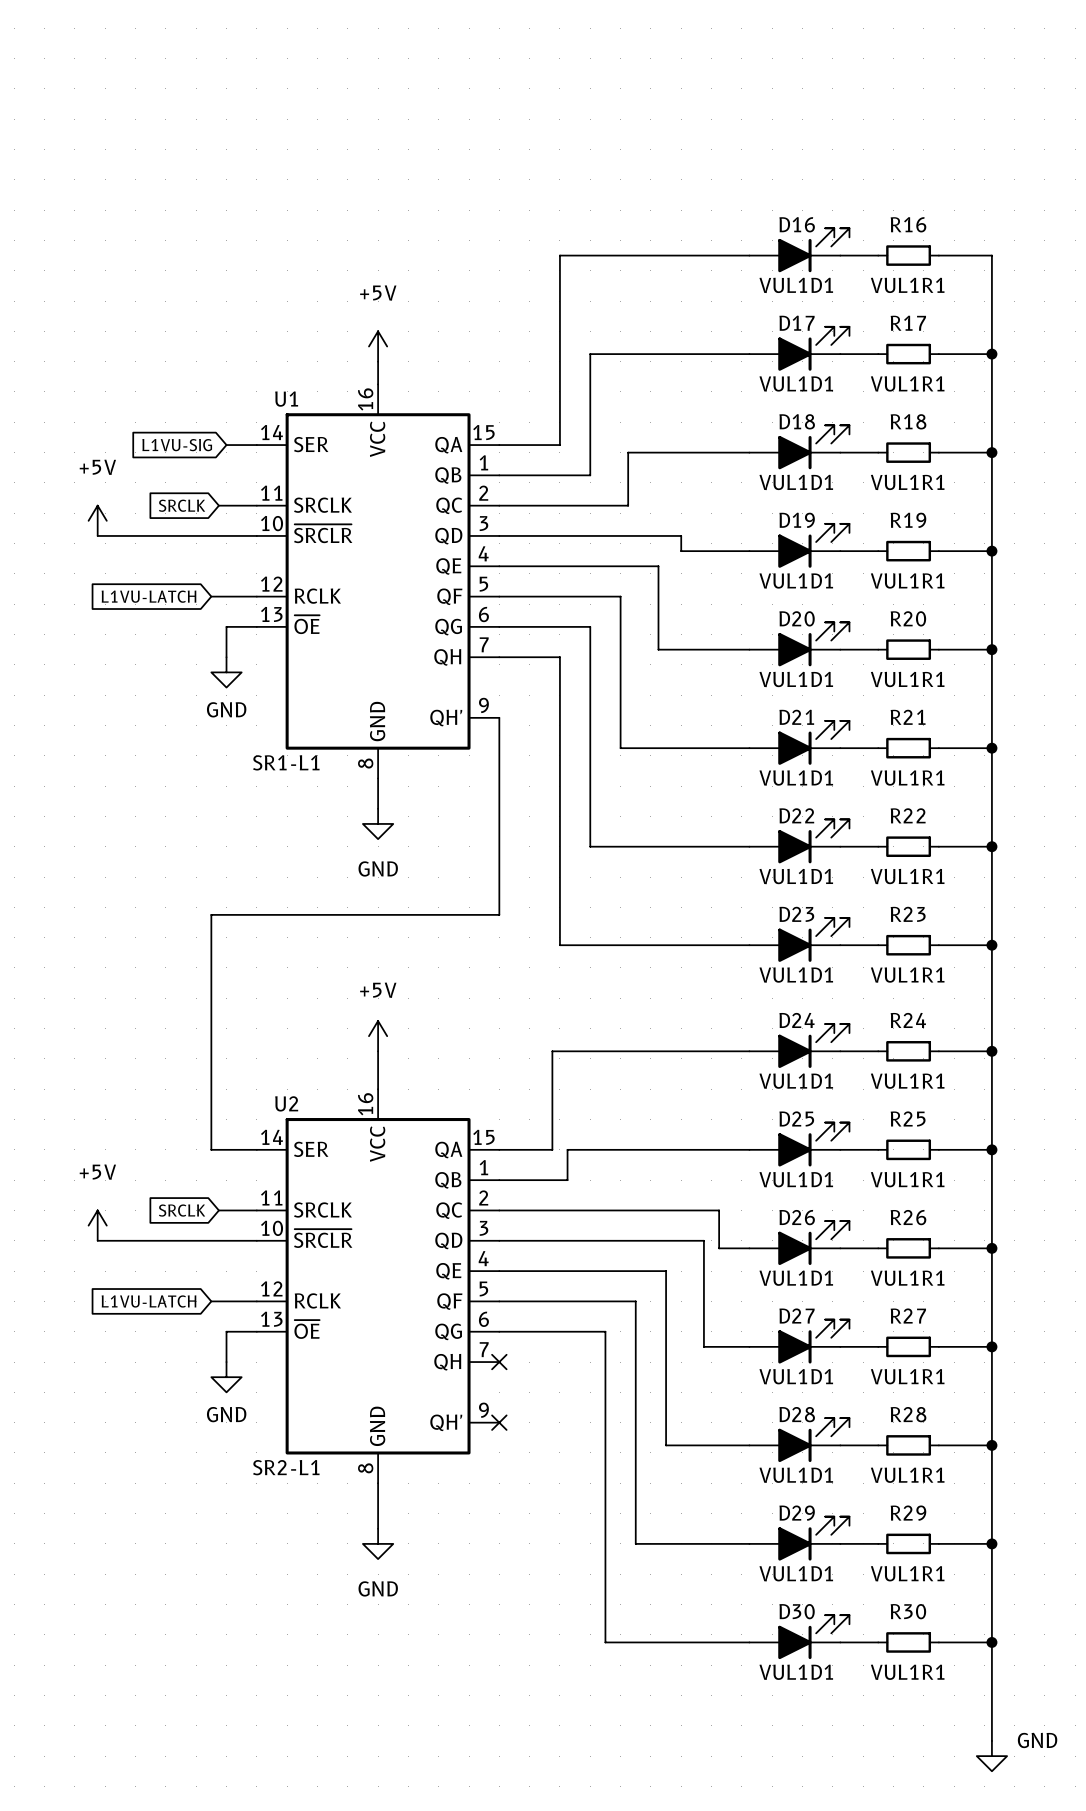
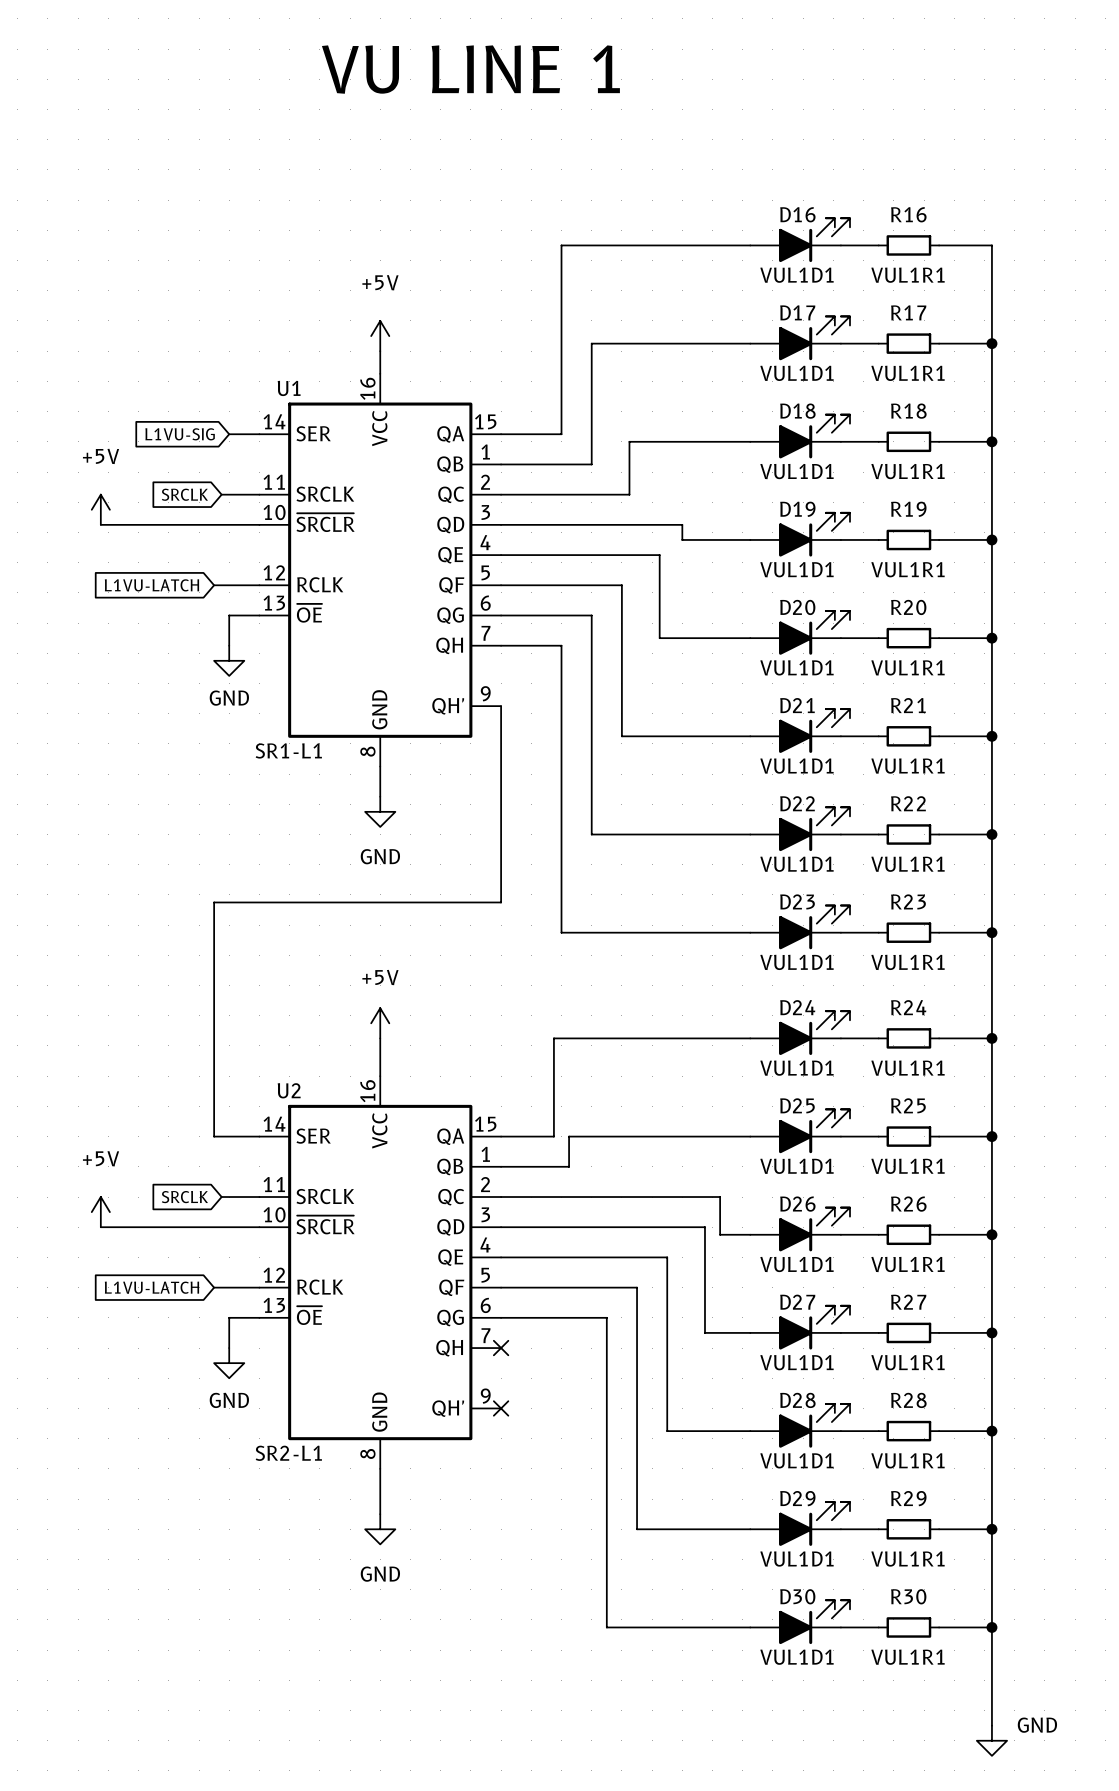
text: none -> VU LINE 1 (470, 69)

